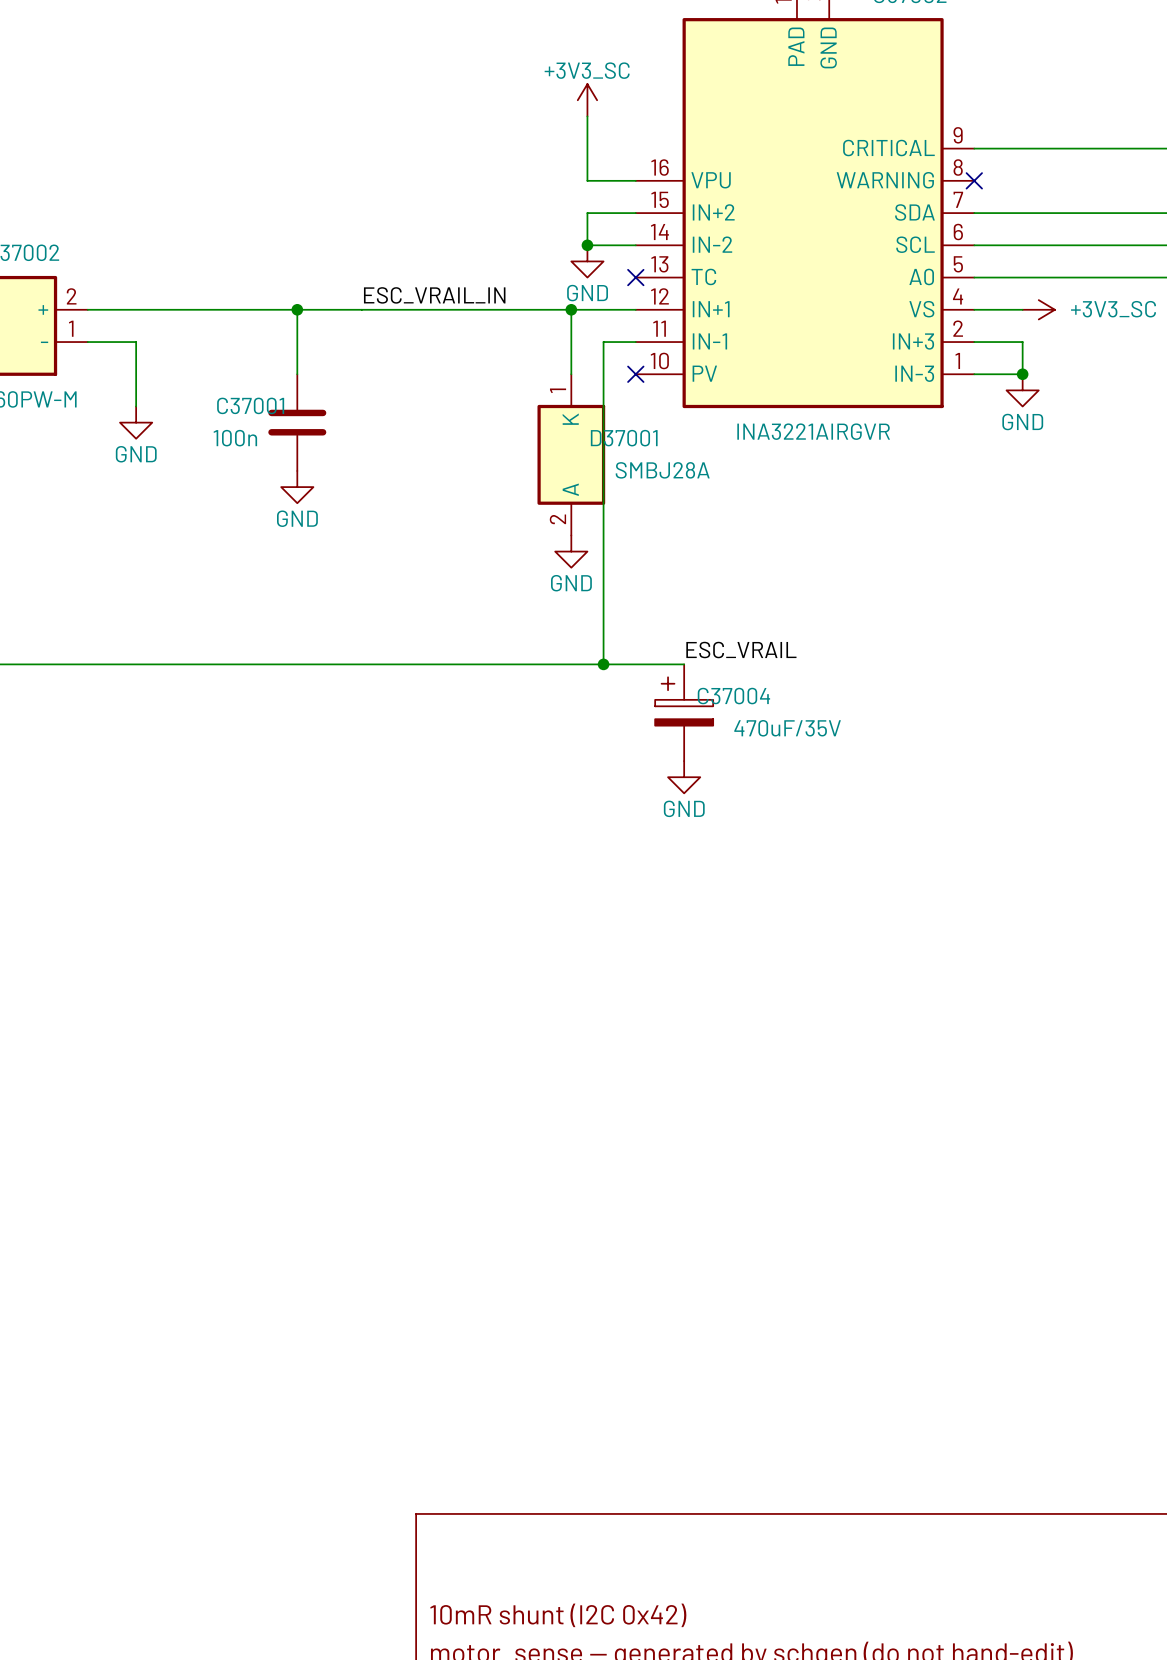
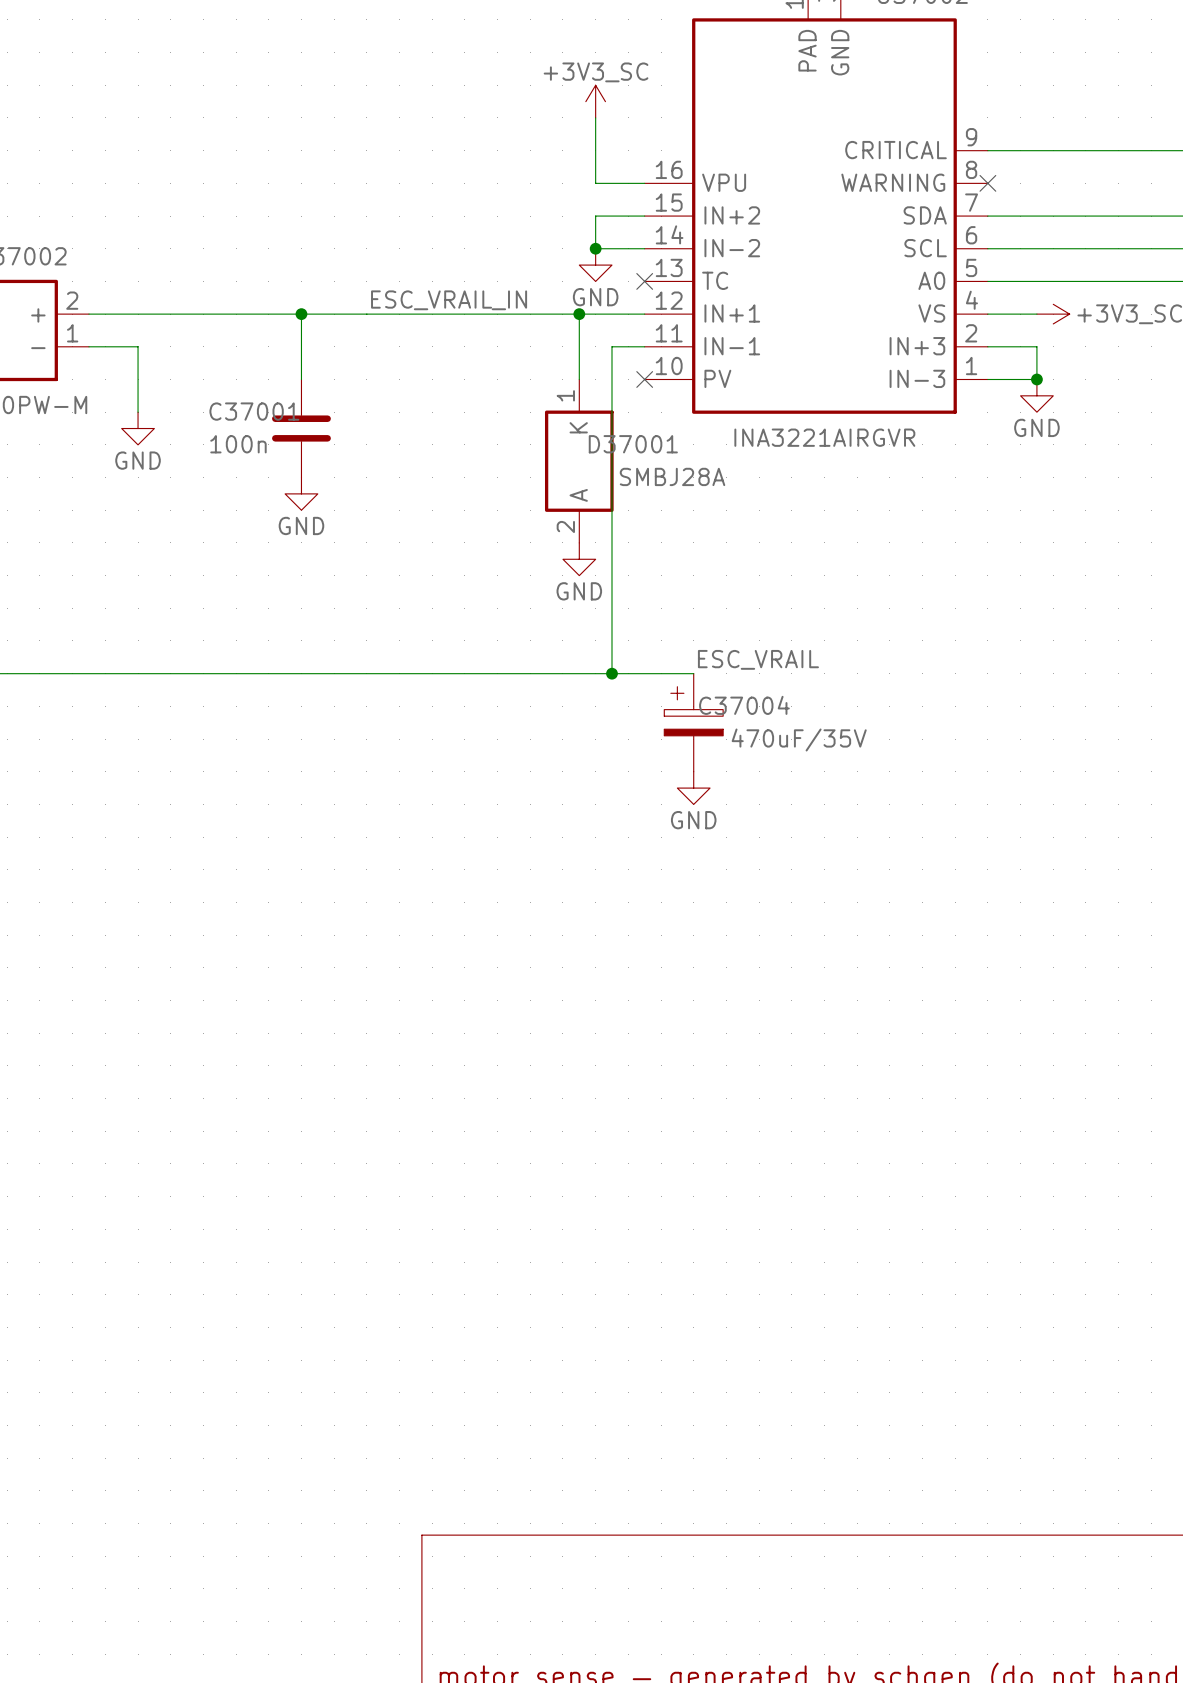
title block: 10mR shunt (I2C 0x42) (558, 1615) -> none

